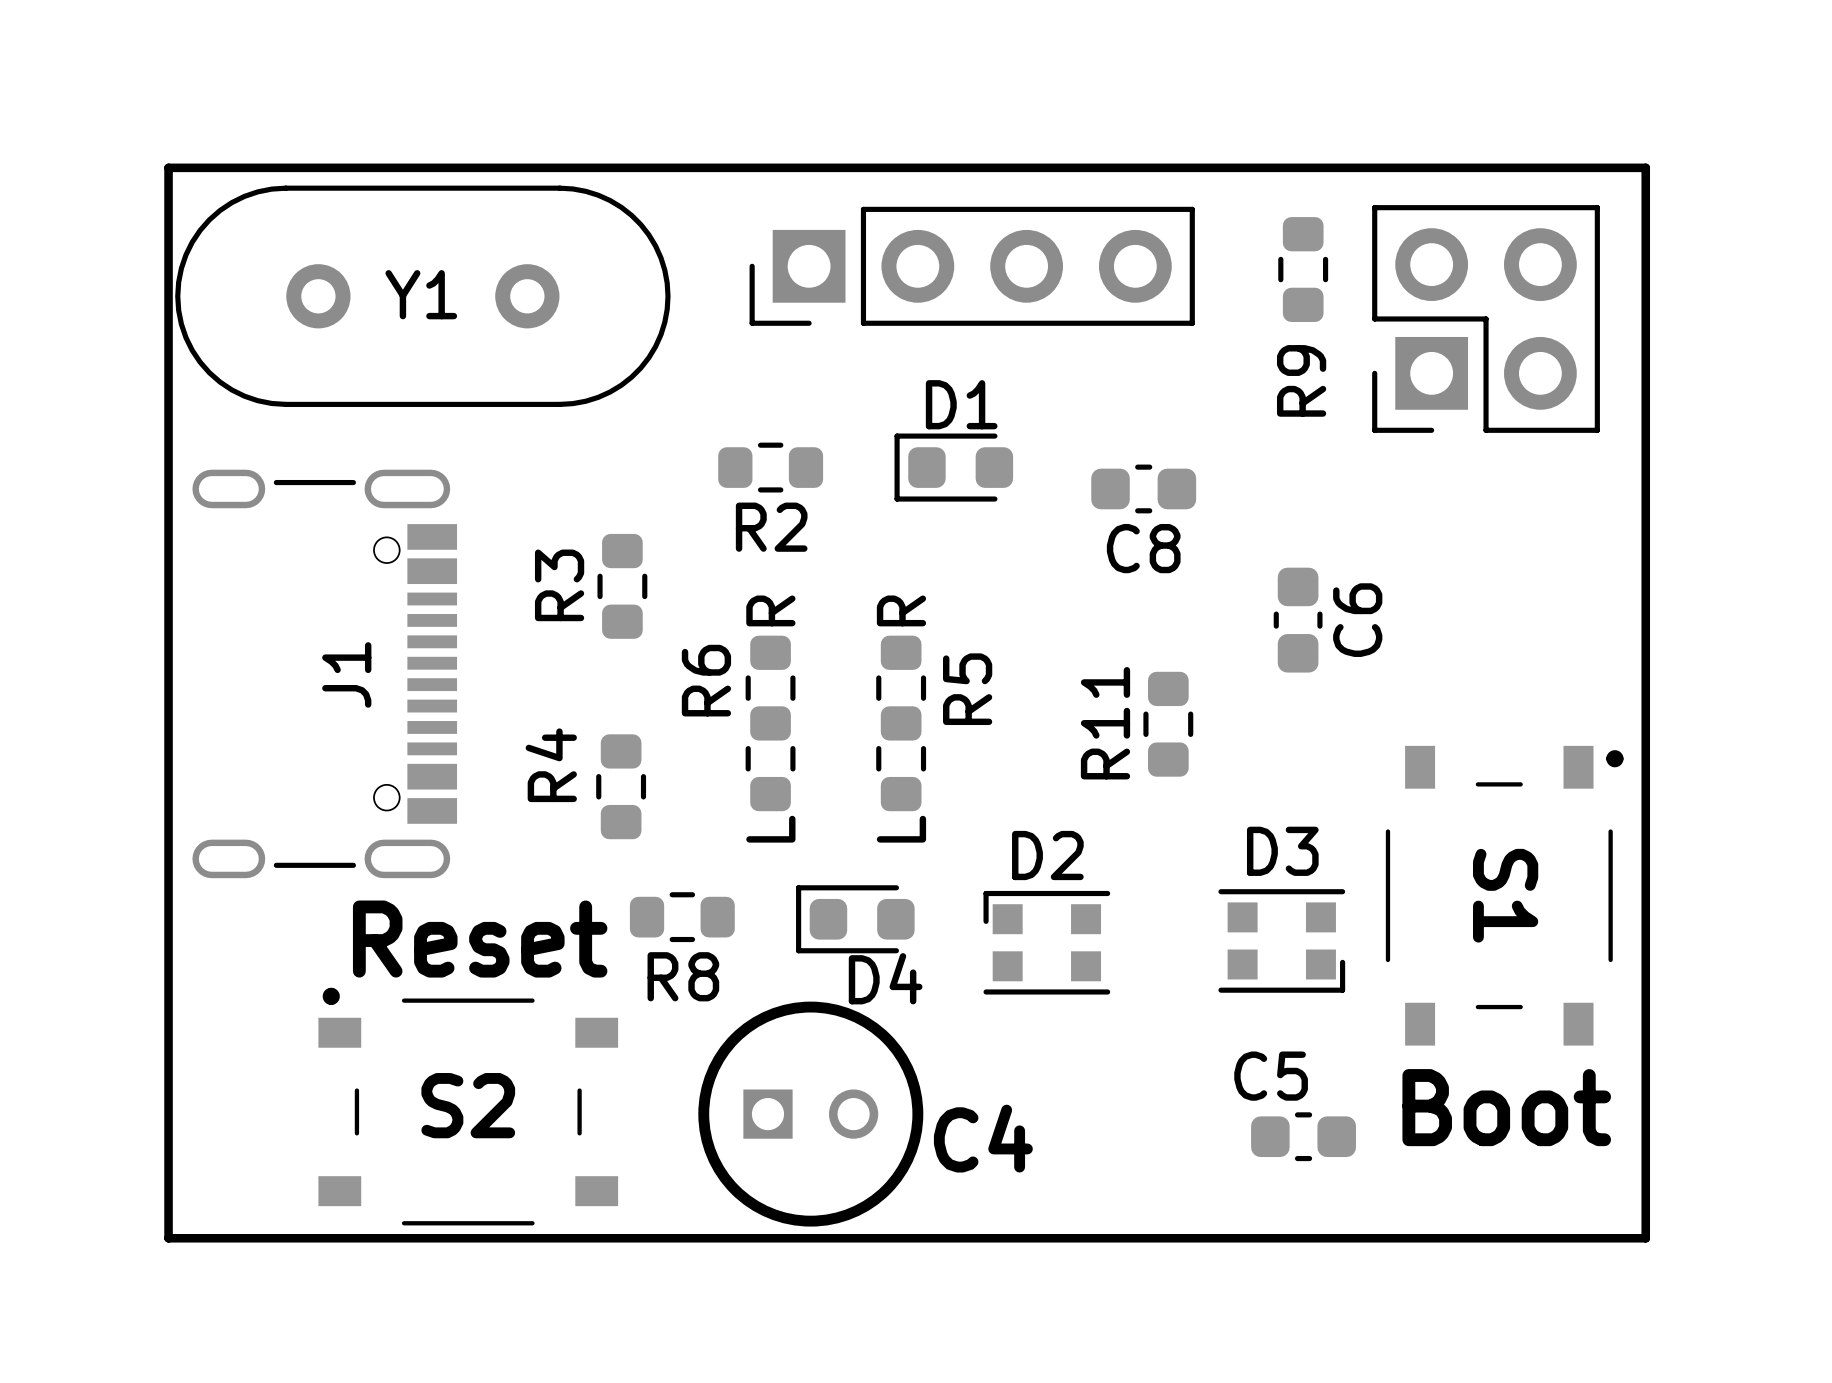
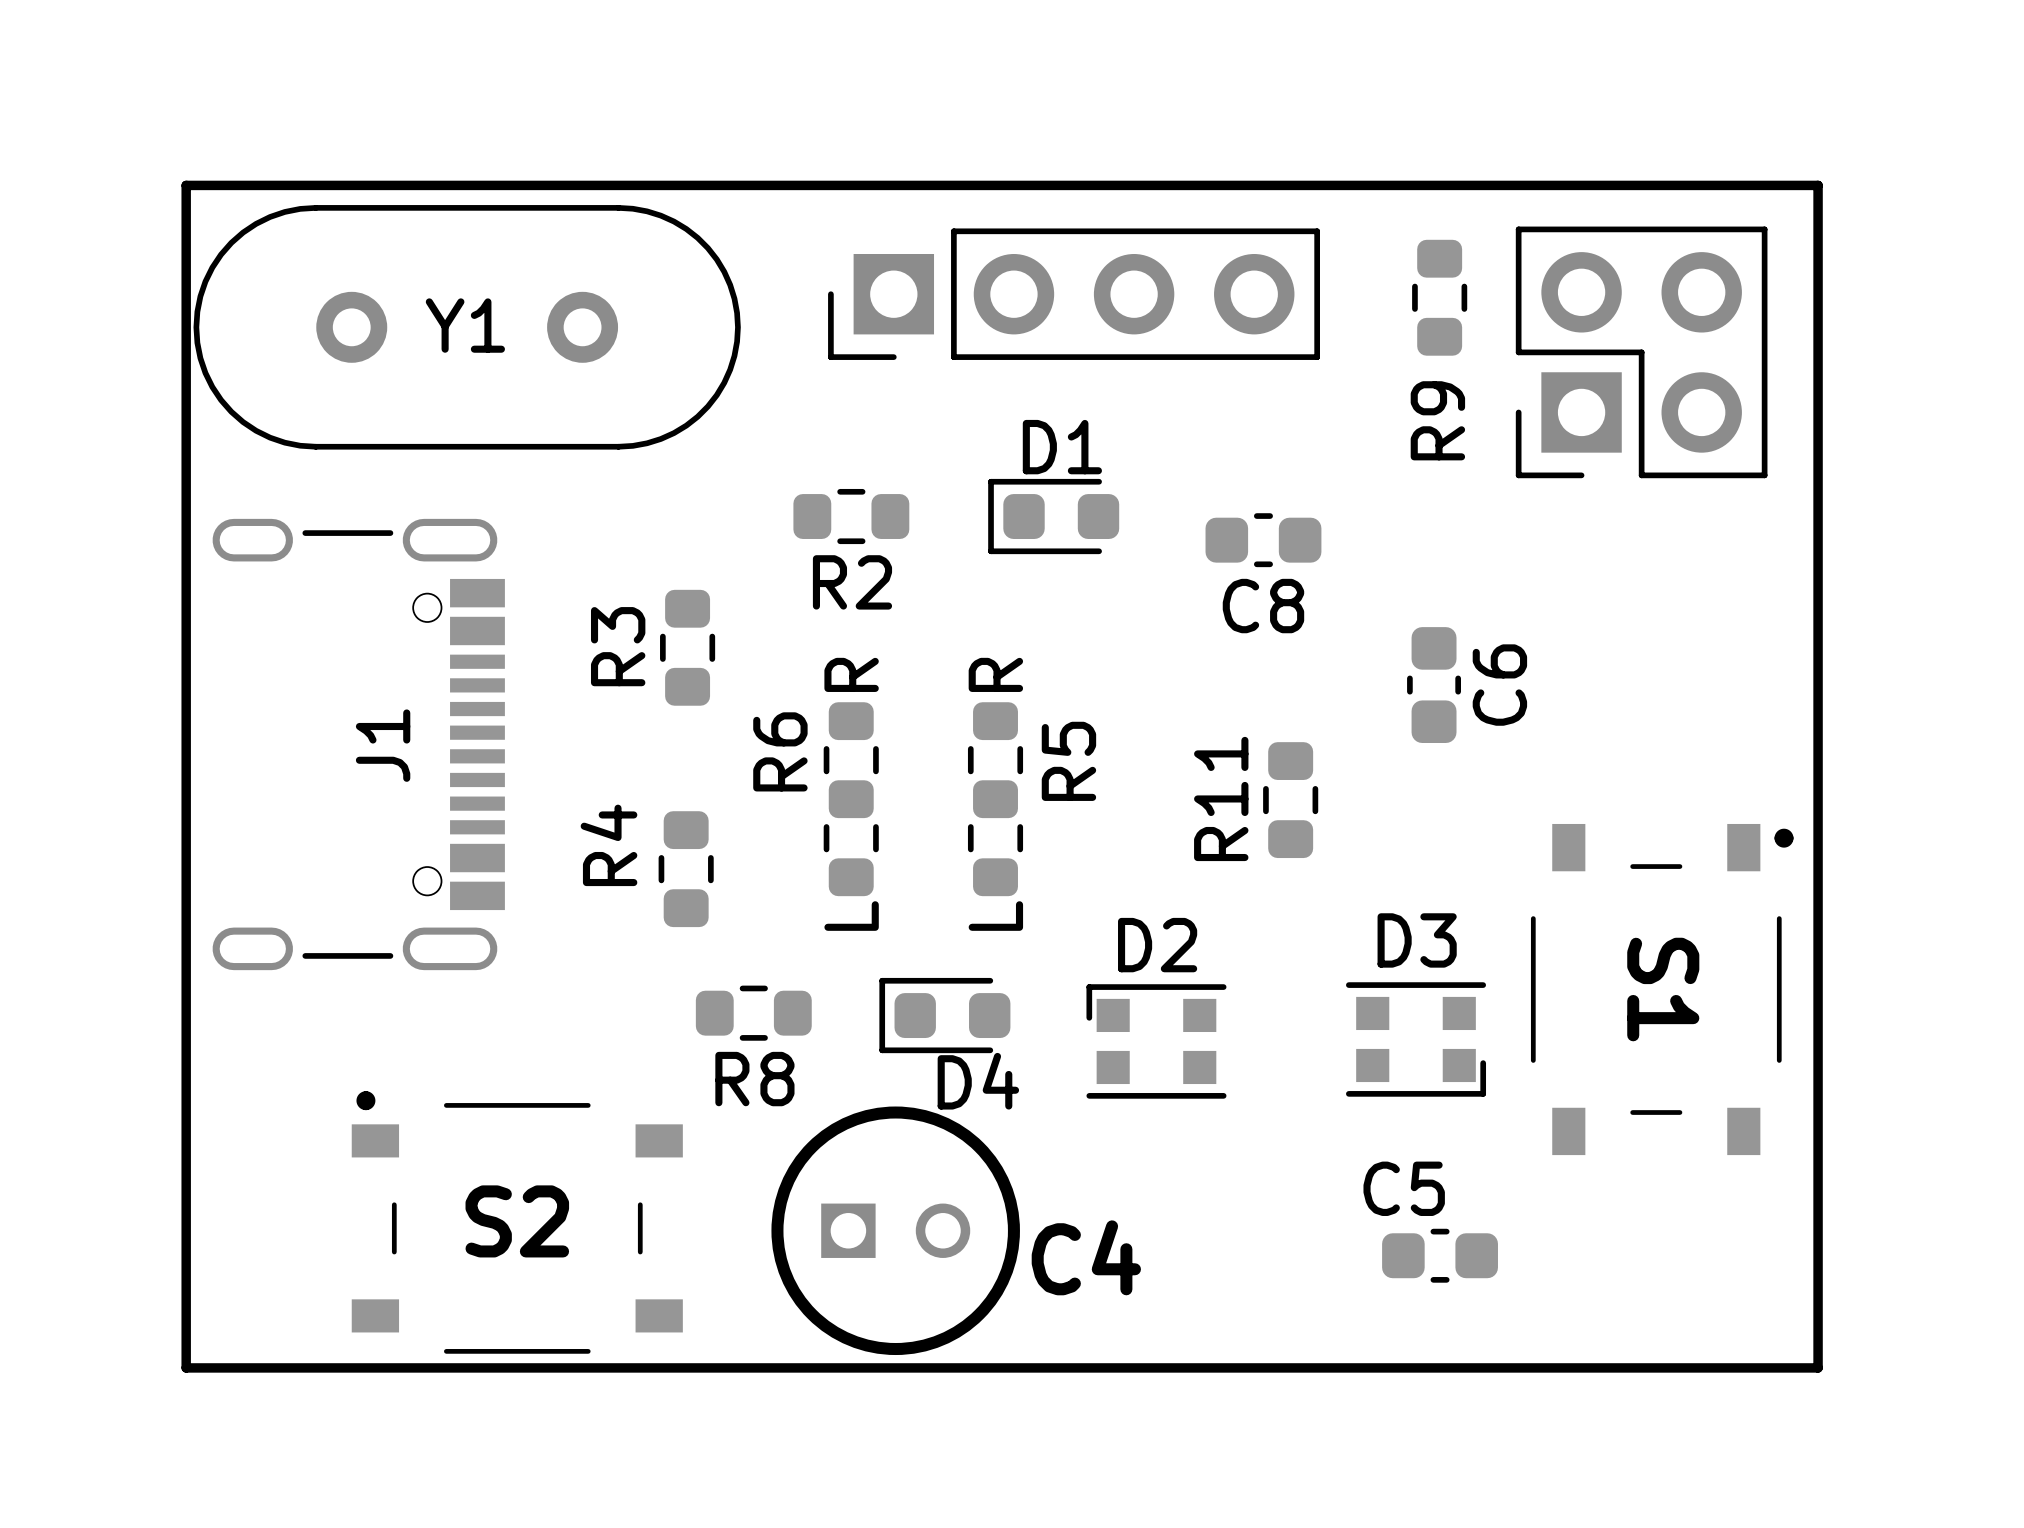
text: Reset (480, 939) -> none
text: Boot (1506, 1107) -> none

